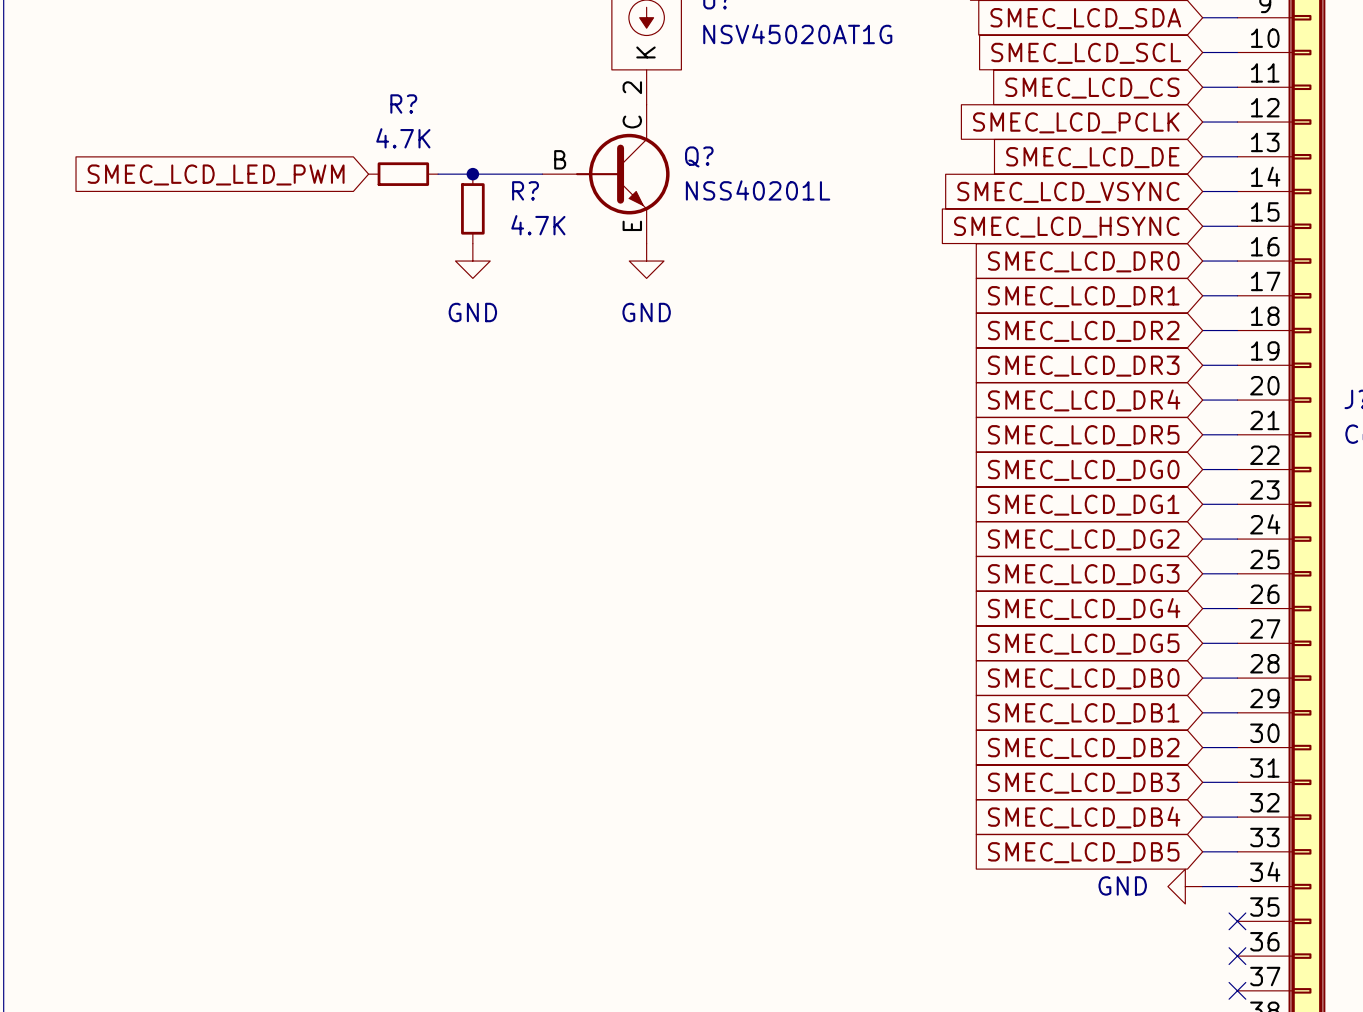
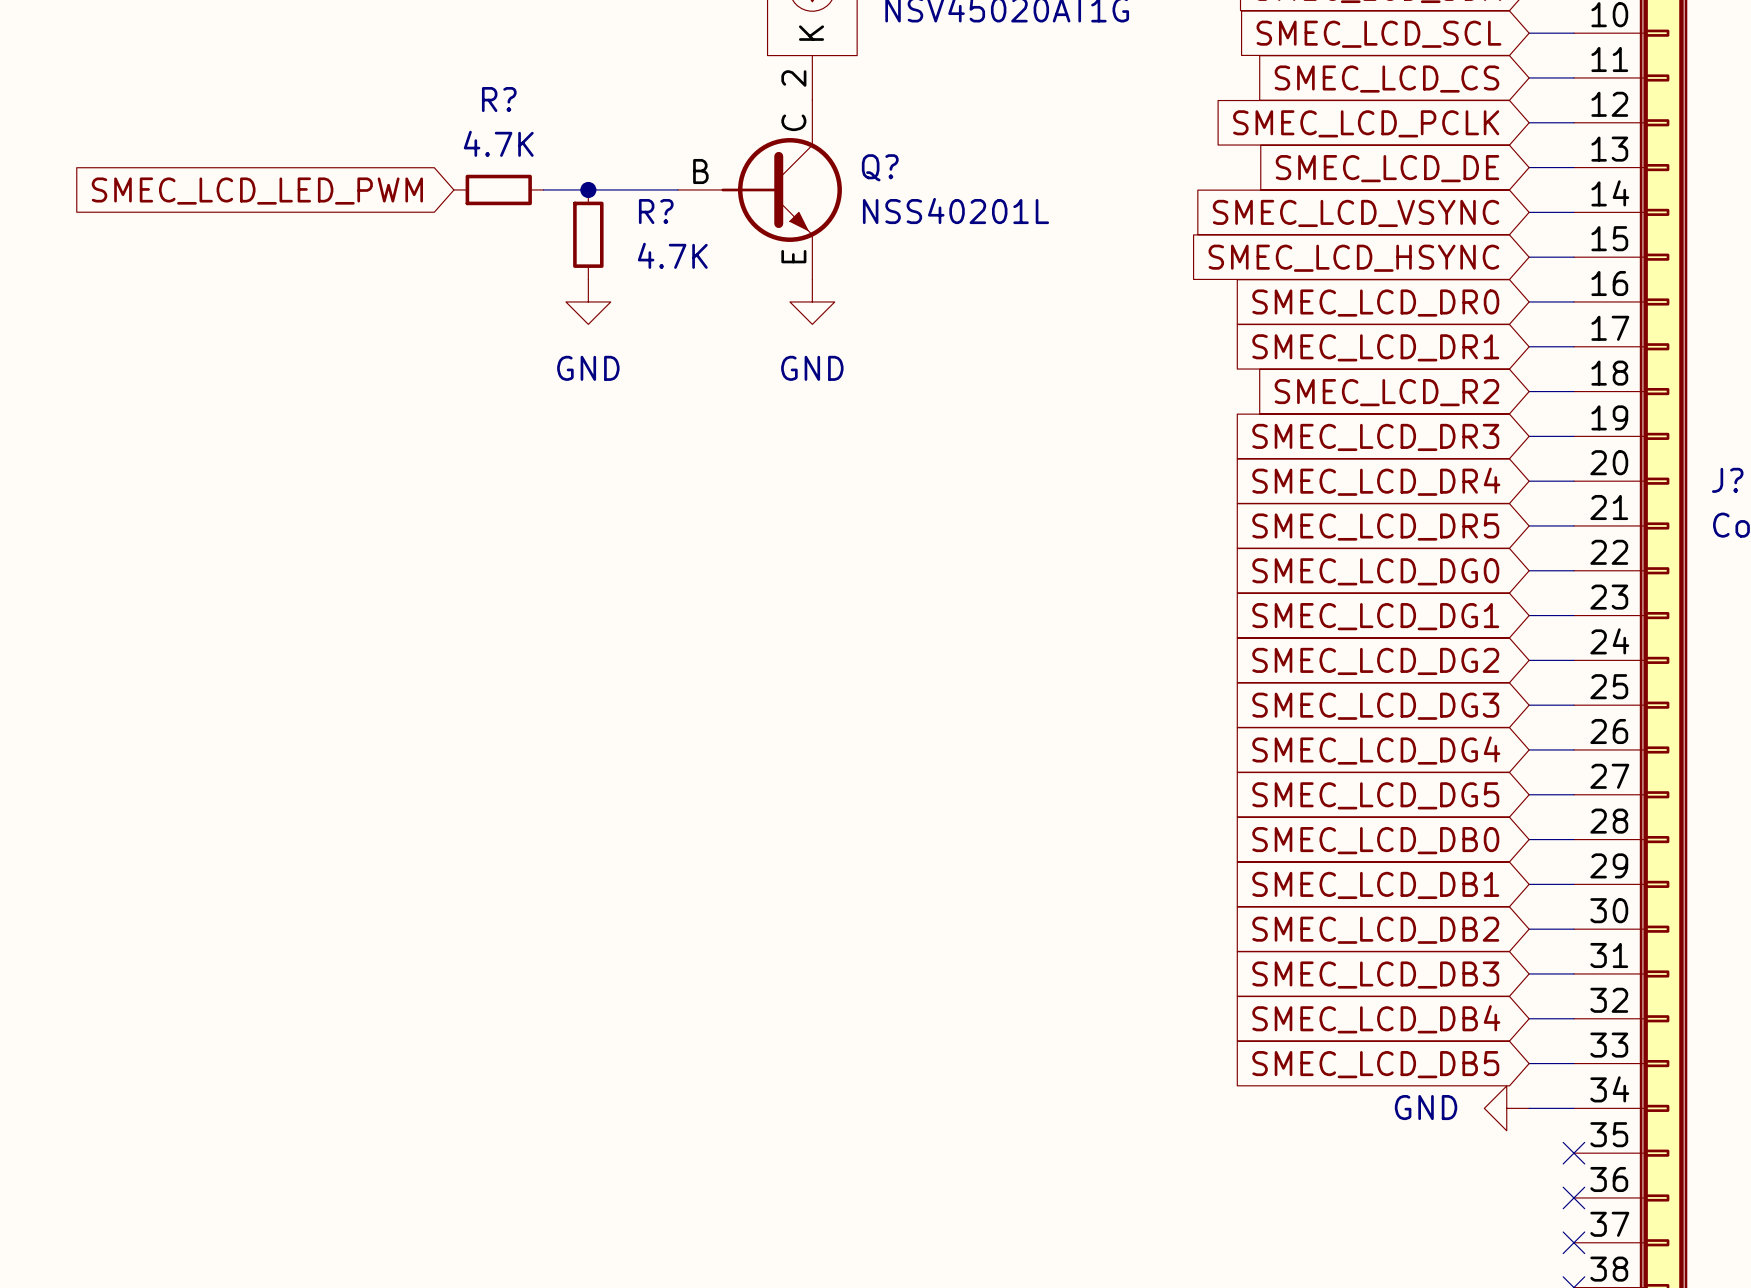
global label: SMEC_LCD_DR2 (1083, 331) -> SMEC_LCD_R2 (1386, 392)

